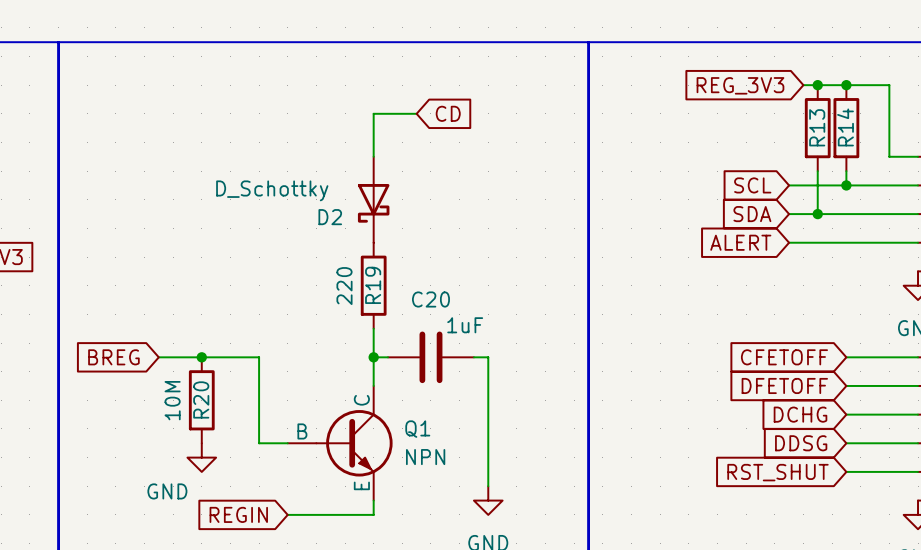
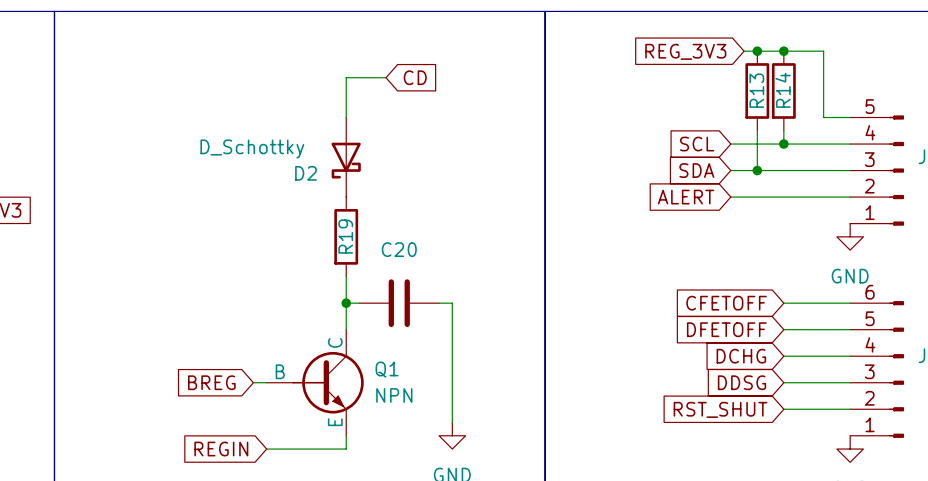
R19 value: 220 (344, 286) -> none
C20 value: 1uF (465, 325) -> none
global label position: BREG (113, 357) -> BREG (211, 382)
wire: (158, 357) (259, 357) (259, 443) (273, 443) -> none
junction: (201, 357) -> none
R20: 10M (201, 400) -> none
power symbol: GND (201, 457) -> none

